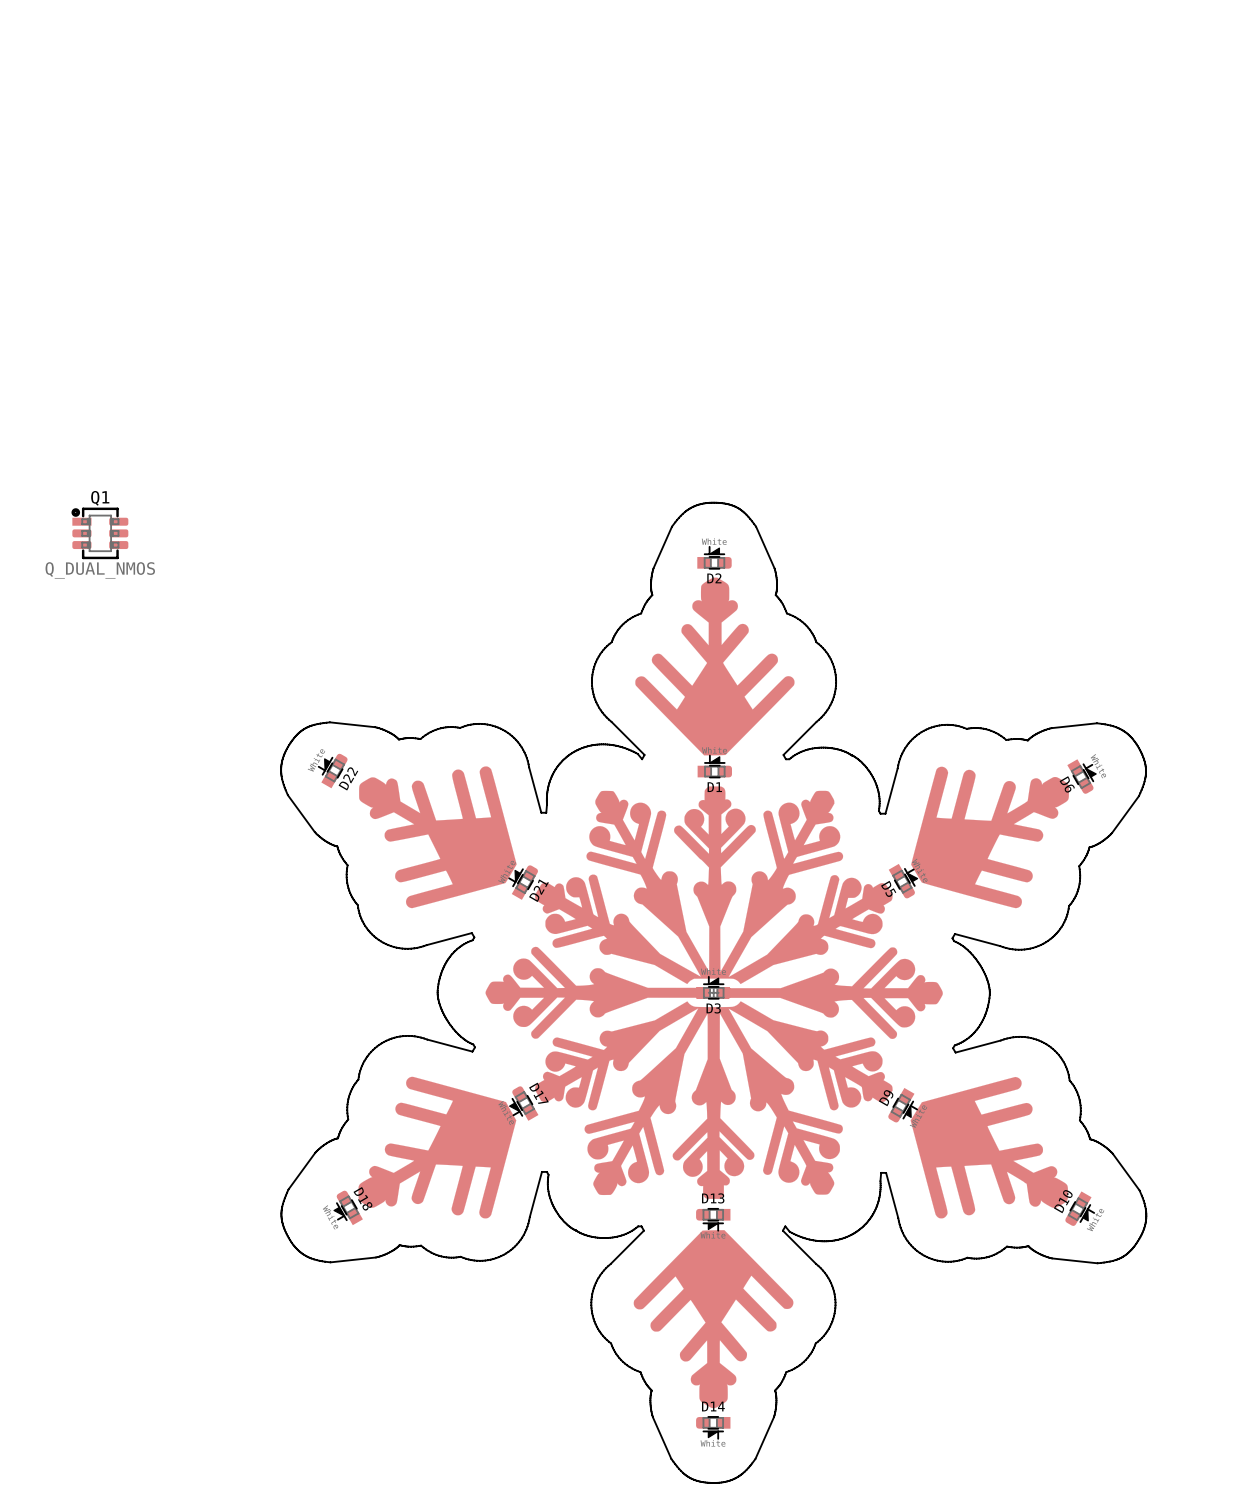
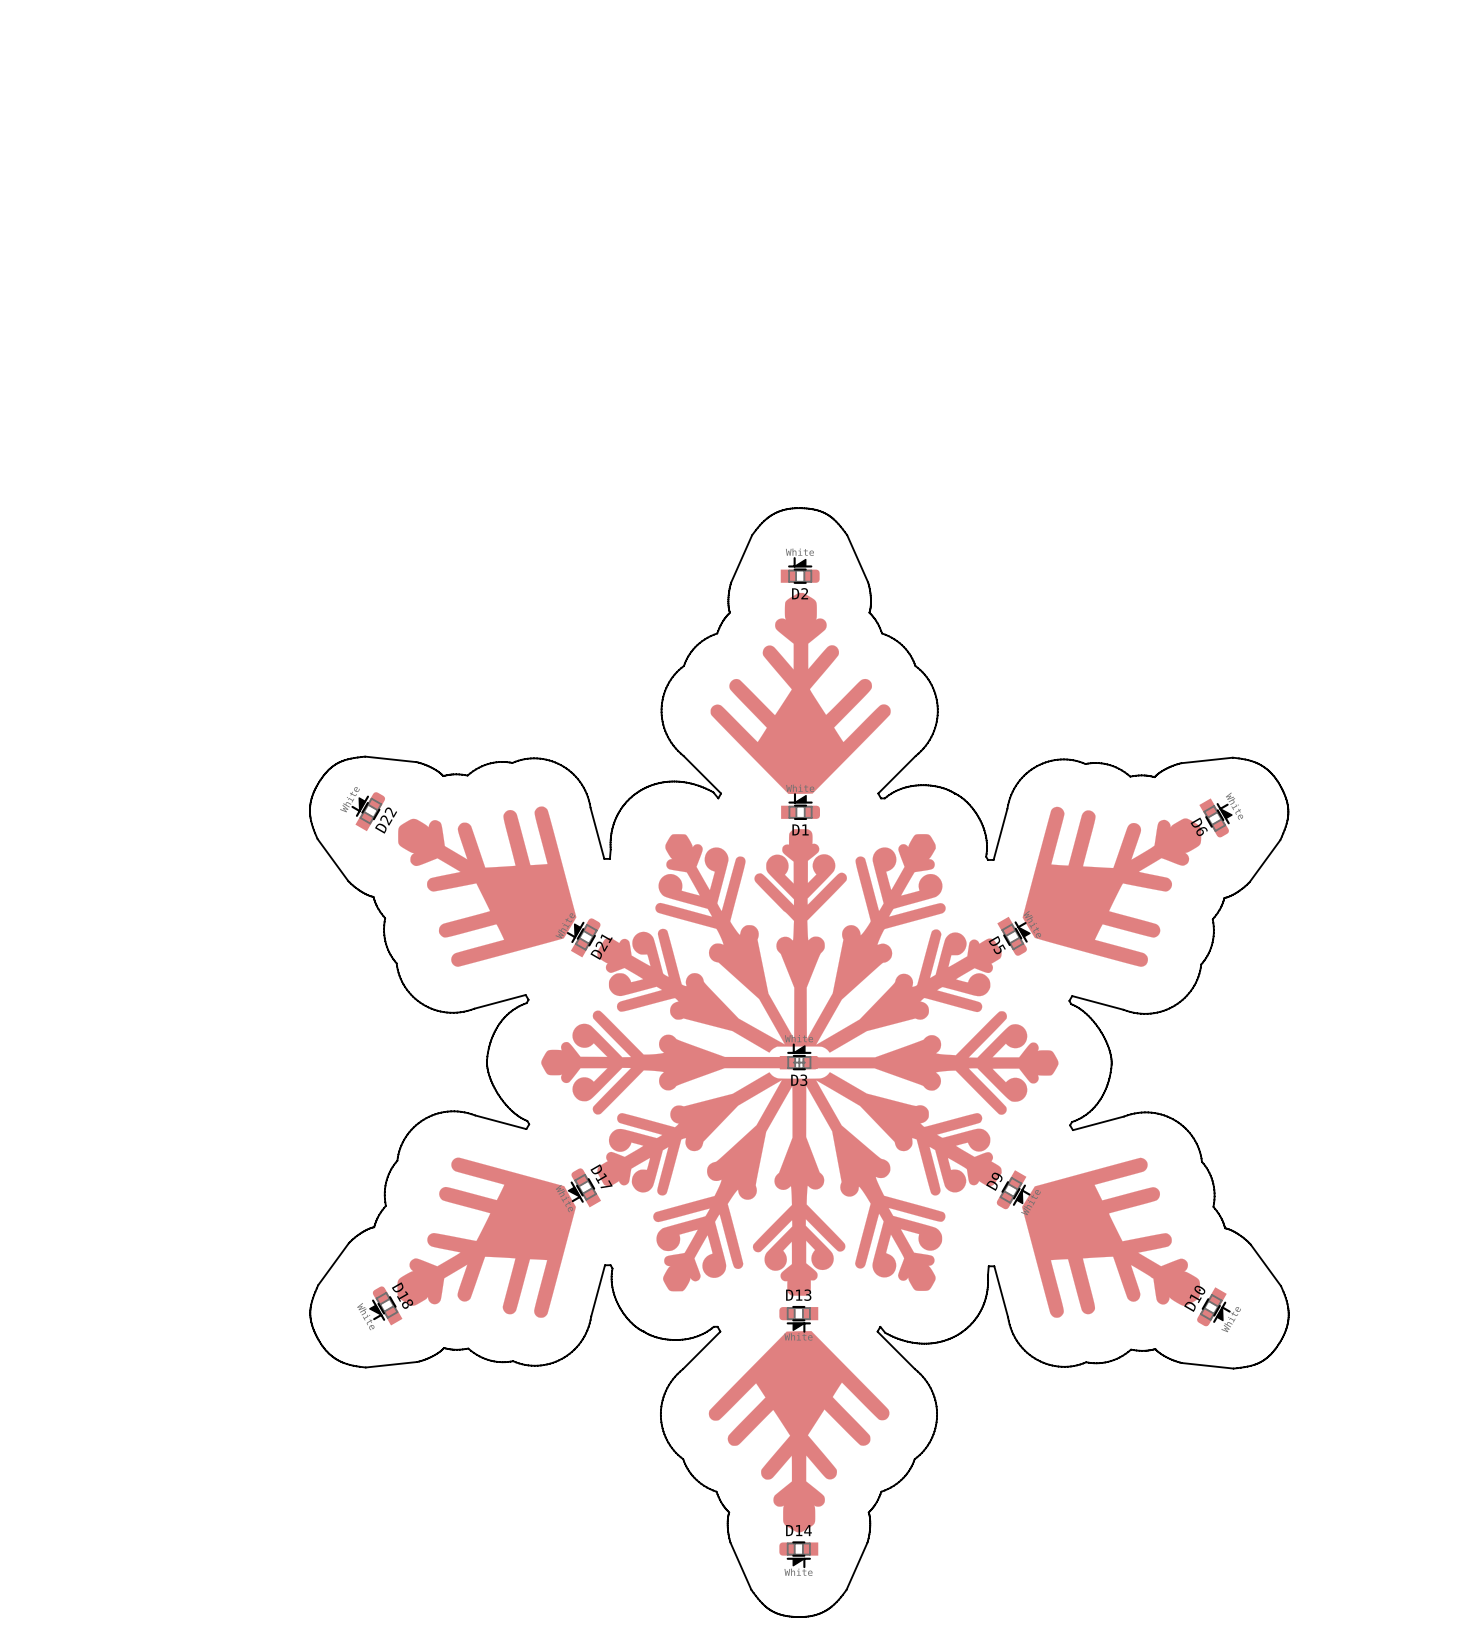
Q1: Q_DUAL_NMOS (99, 533) -> none

